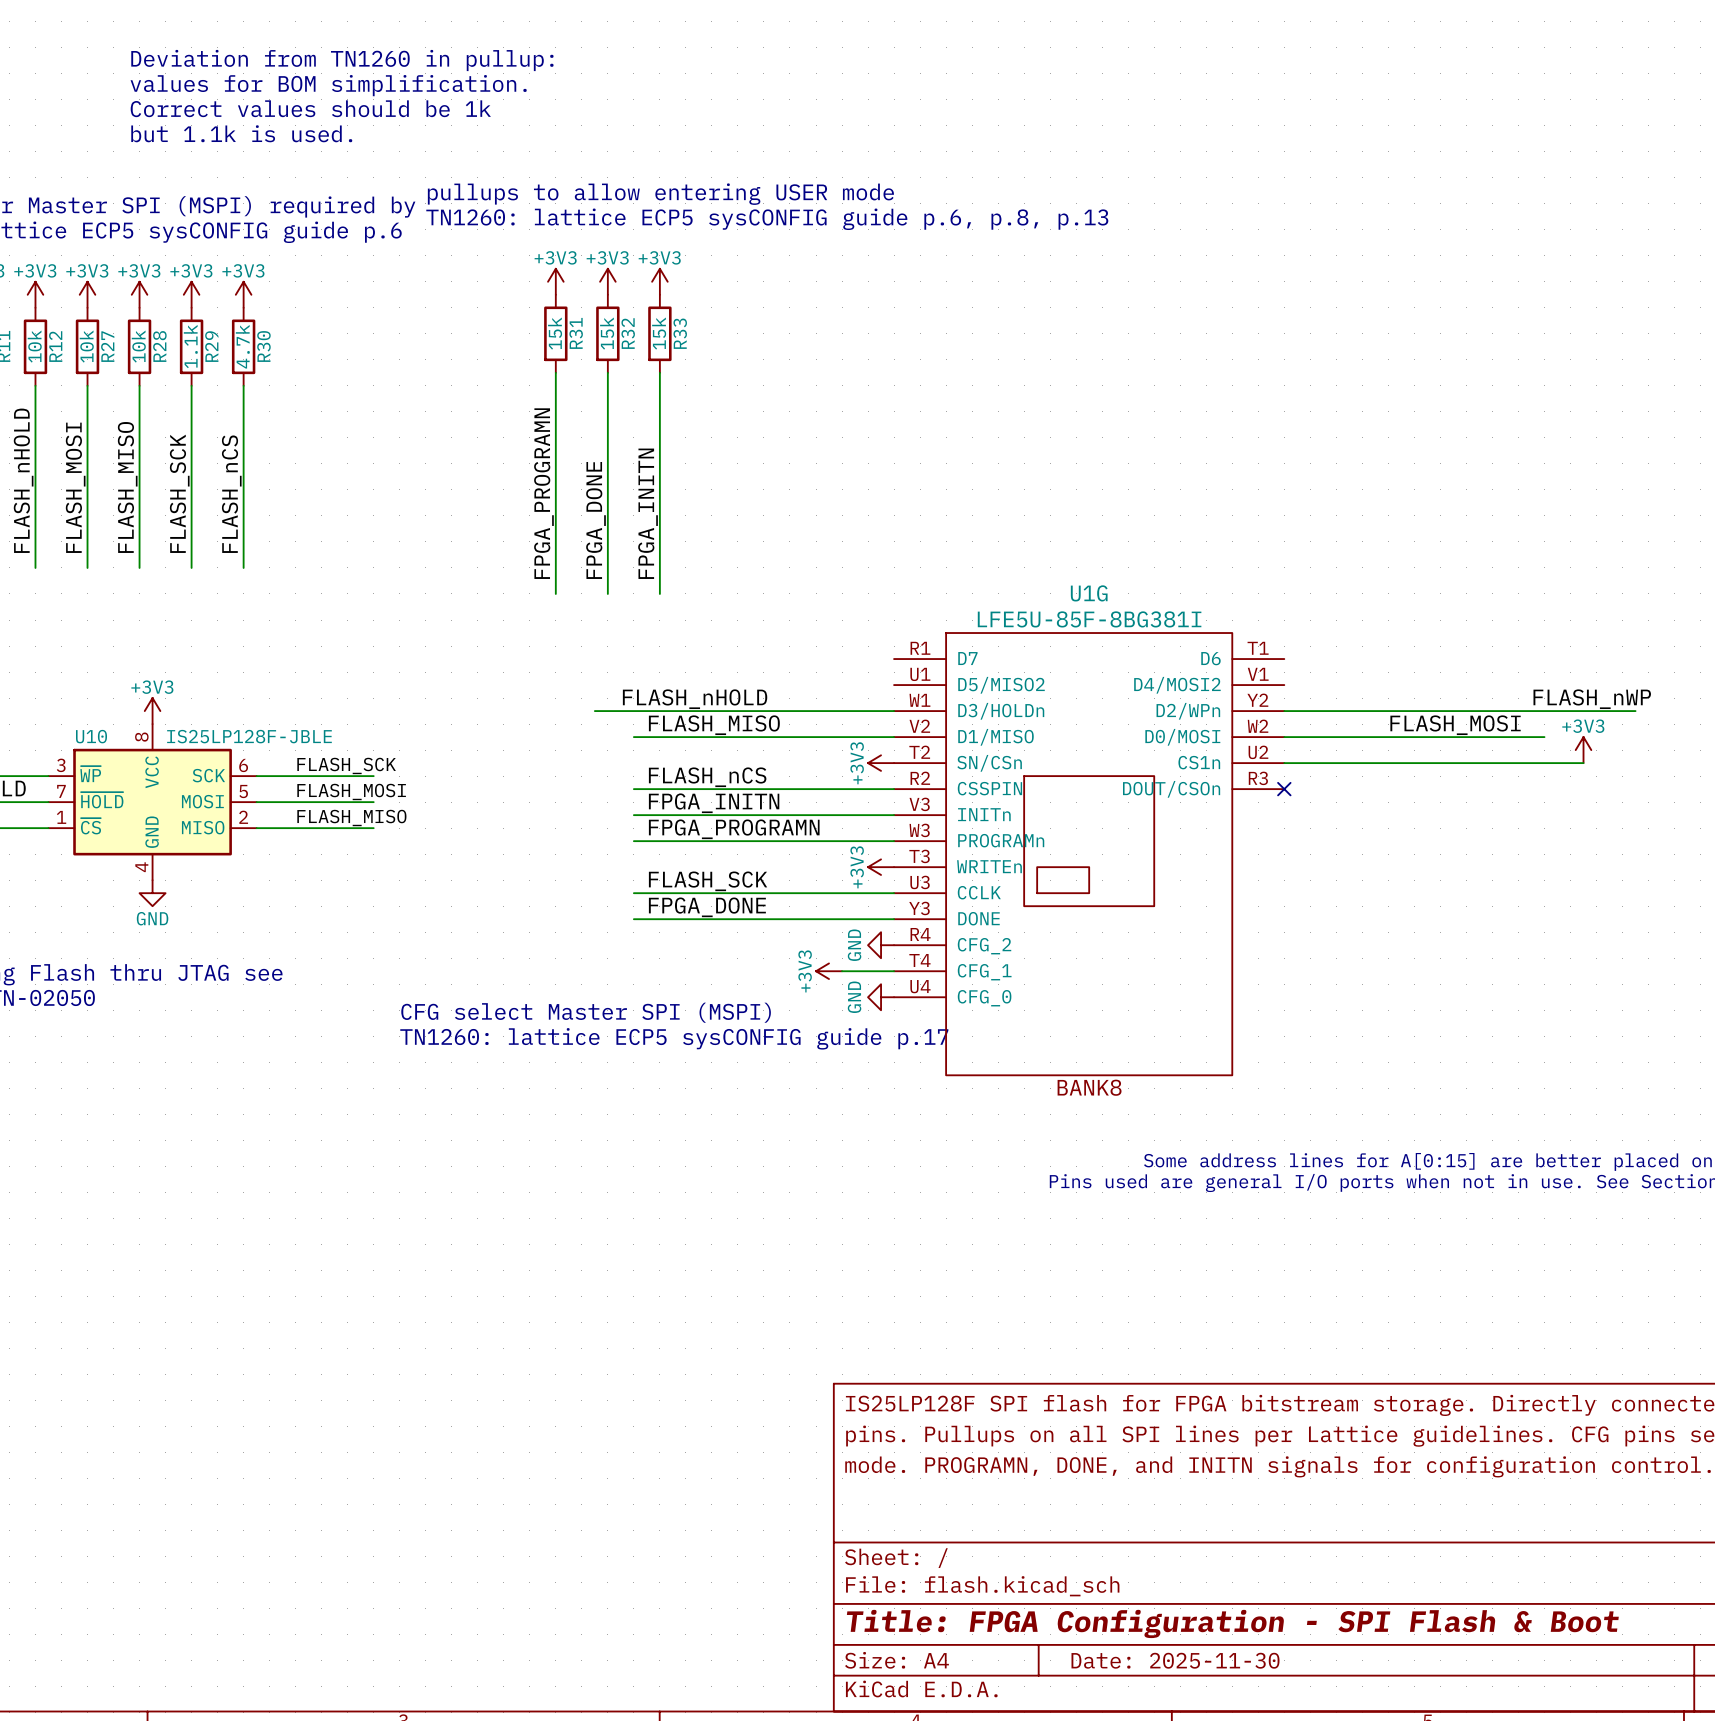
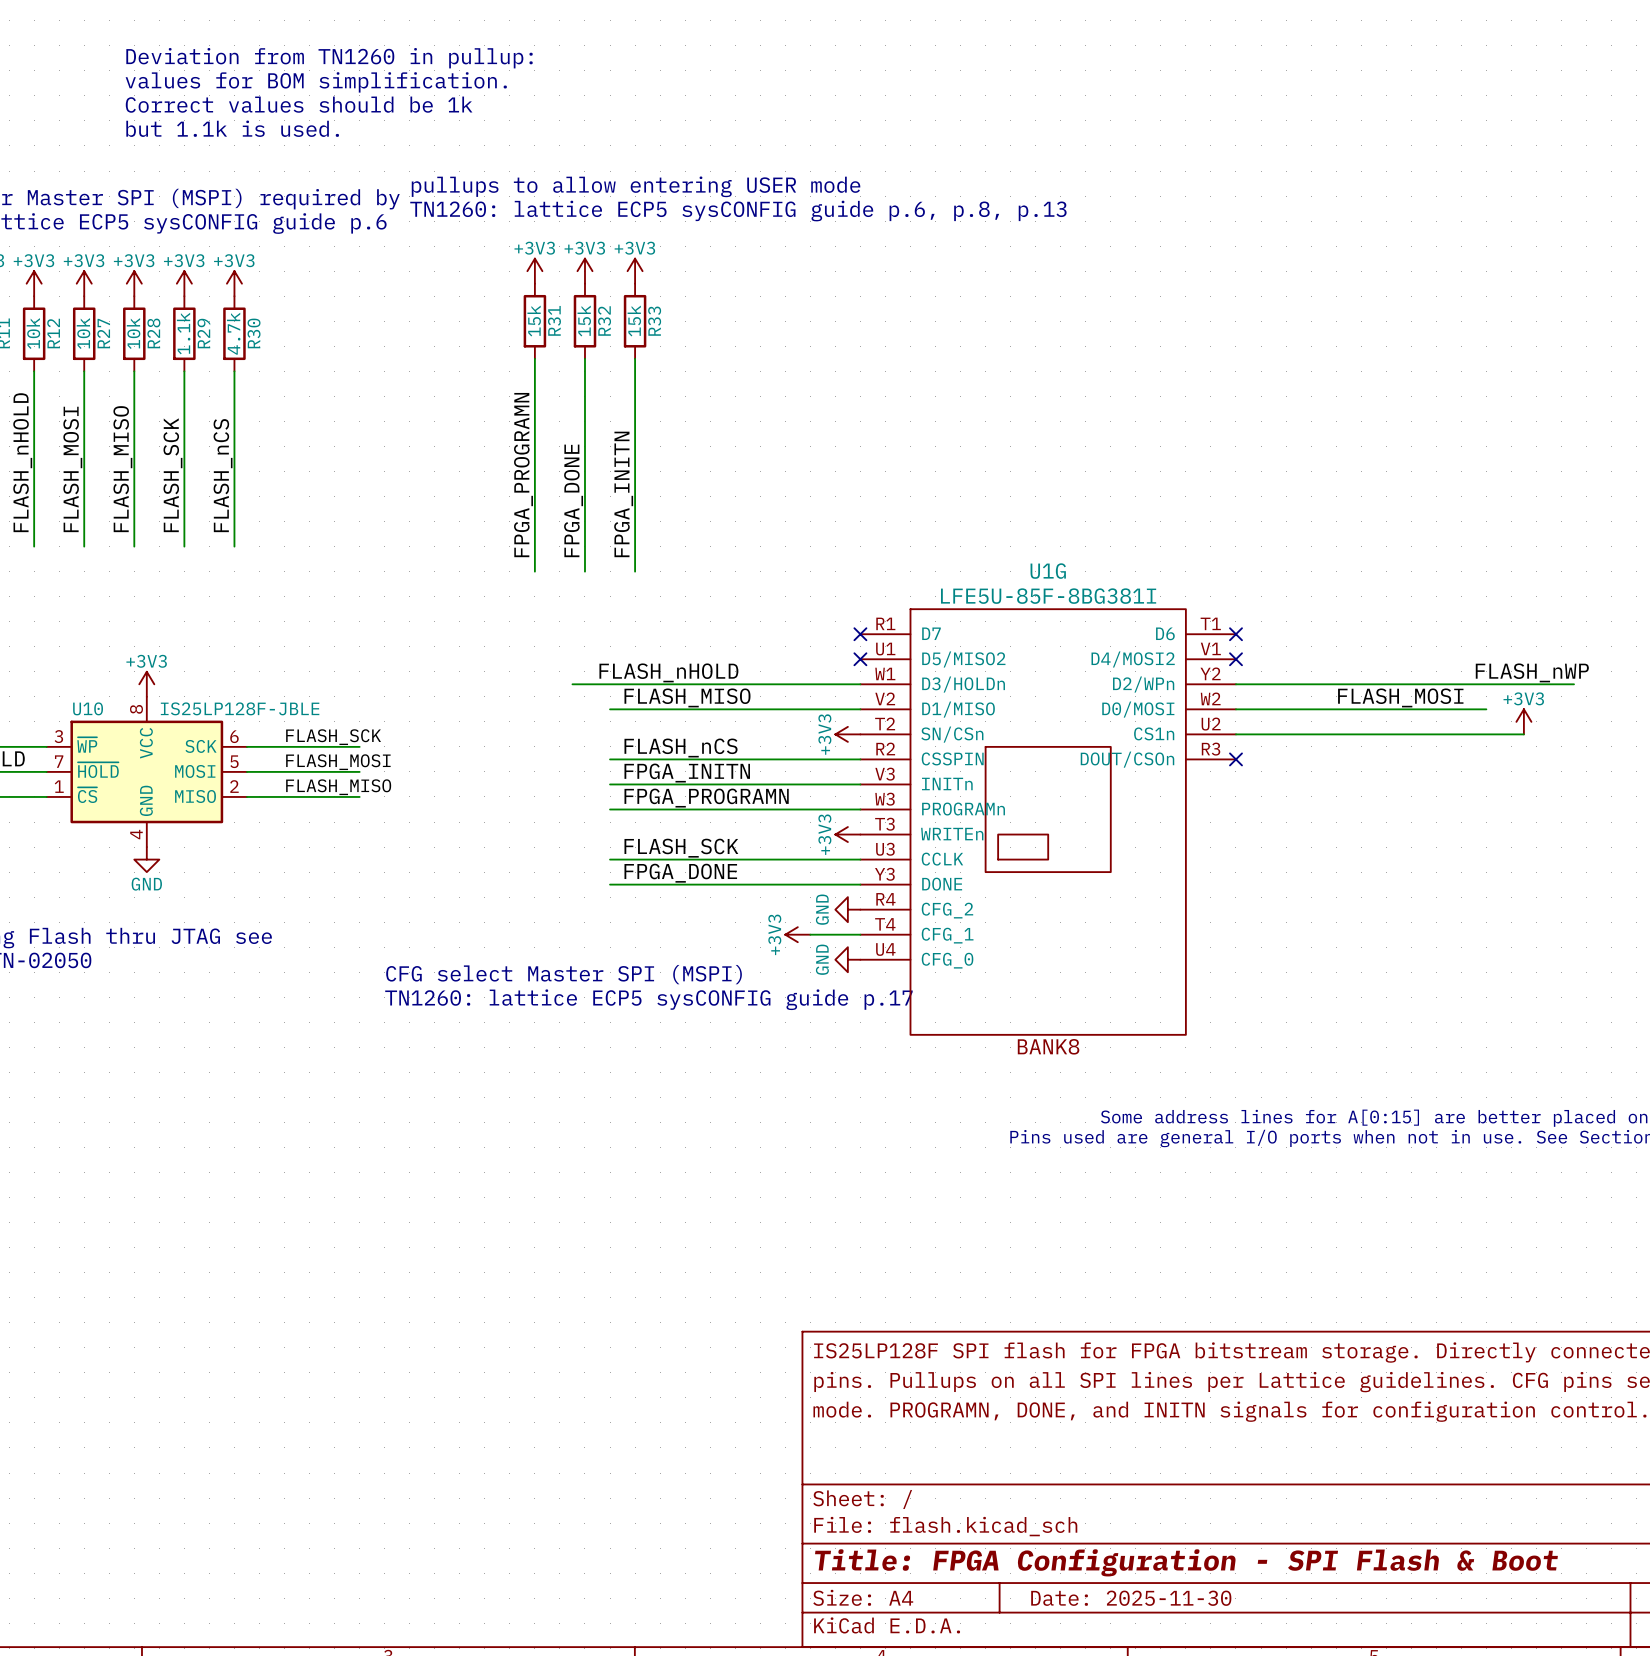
no-connect mark: none -> (860, 634)
no-connect mark: none -> (1235, 634)
no-connect mark: none -> (860, 659)
no-connect mark: none -> (1235, 659)

